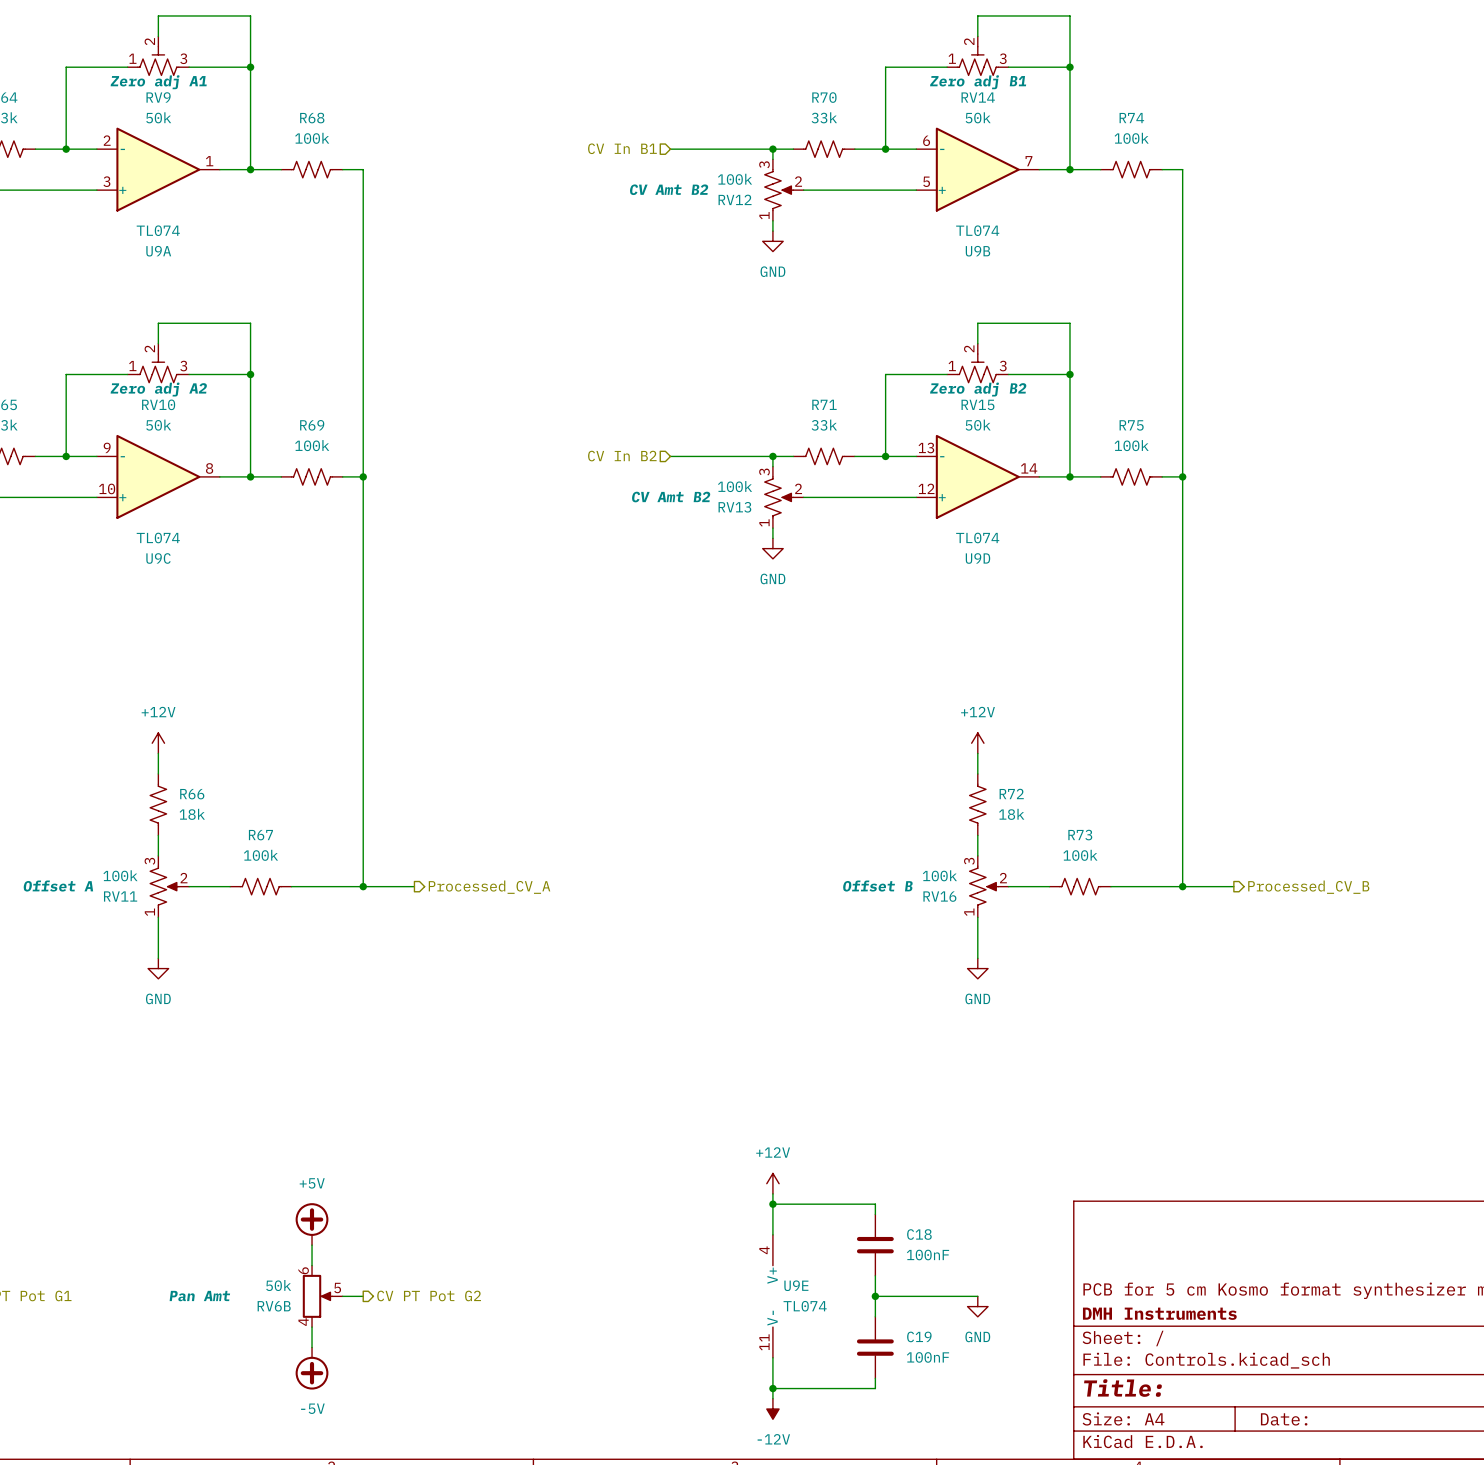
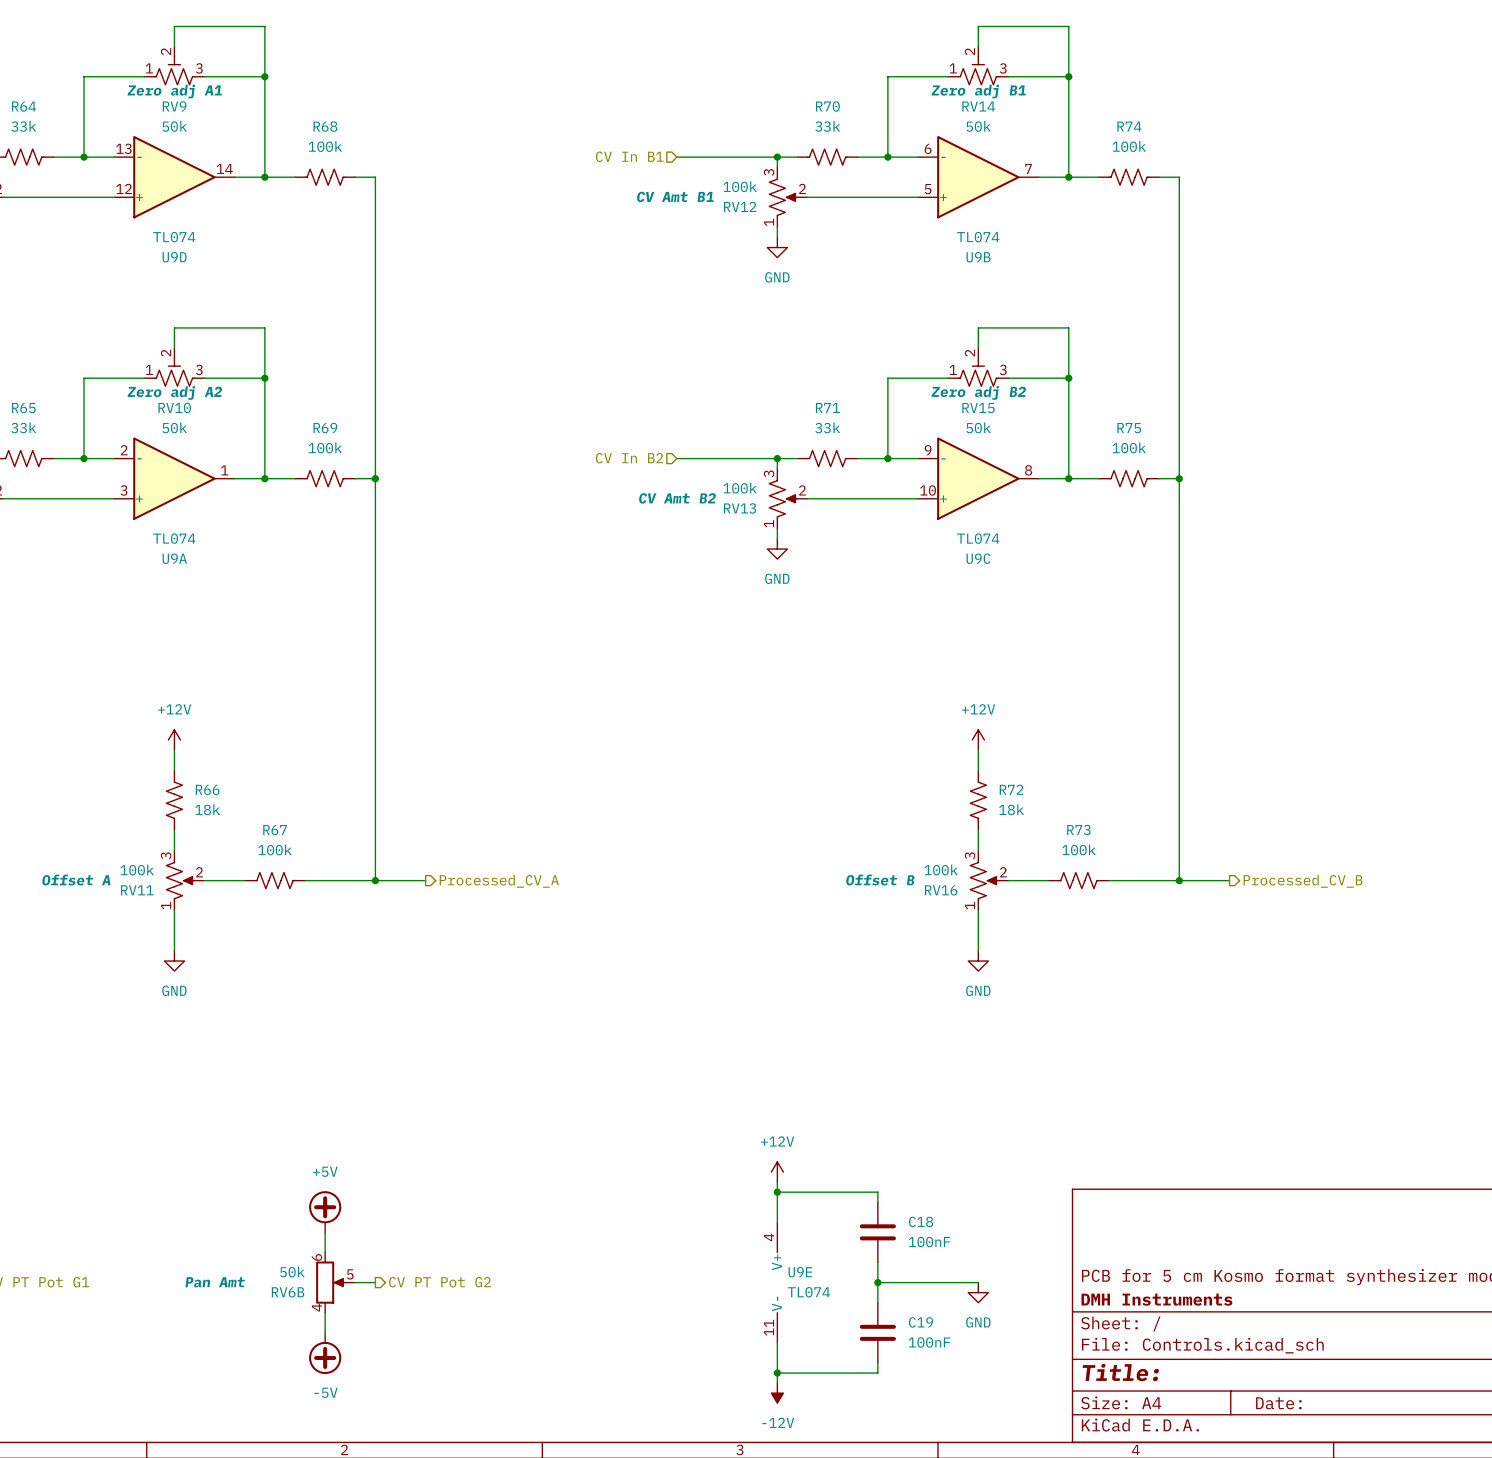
U9A position: (158, 169) -> (174, 478)
RV12 text: CV Amt B2 (668, 189) -> CV Amt B1 (675, 196)
U9C position: (158, 476) -> (978, 478)
U9D position: (977, 476) -> (174, 177)

